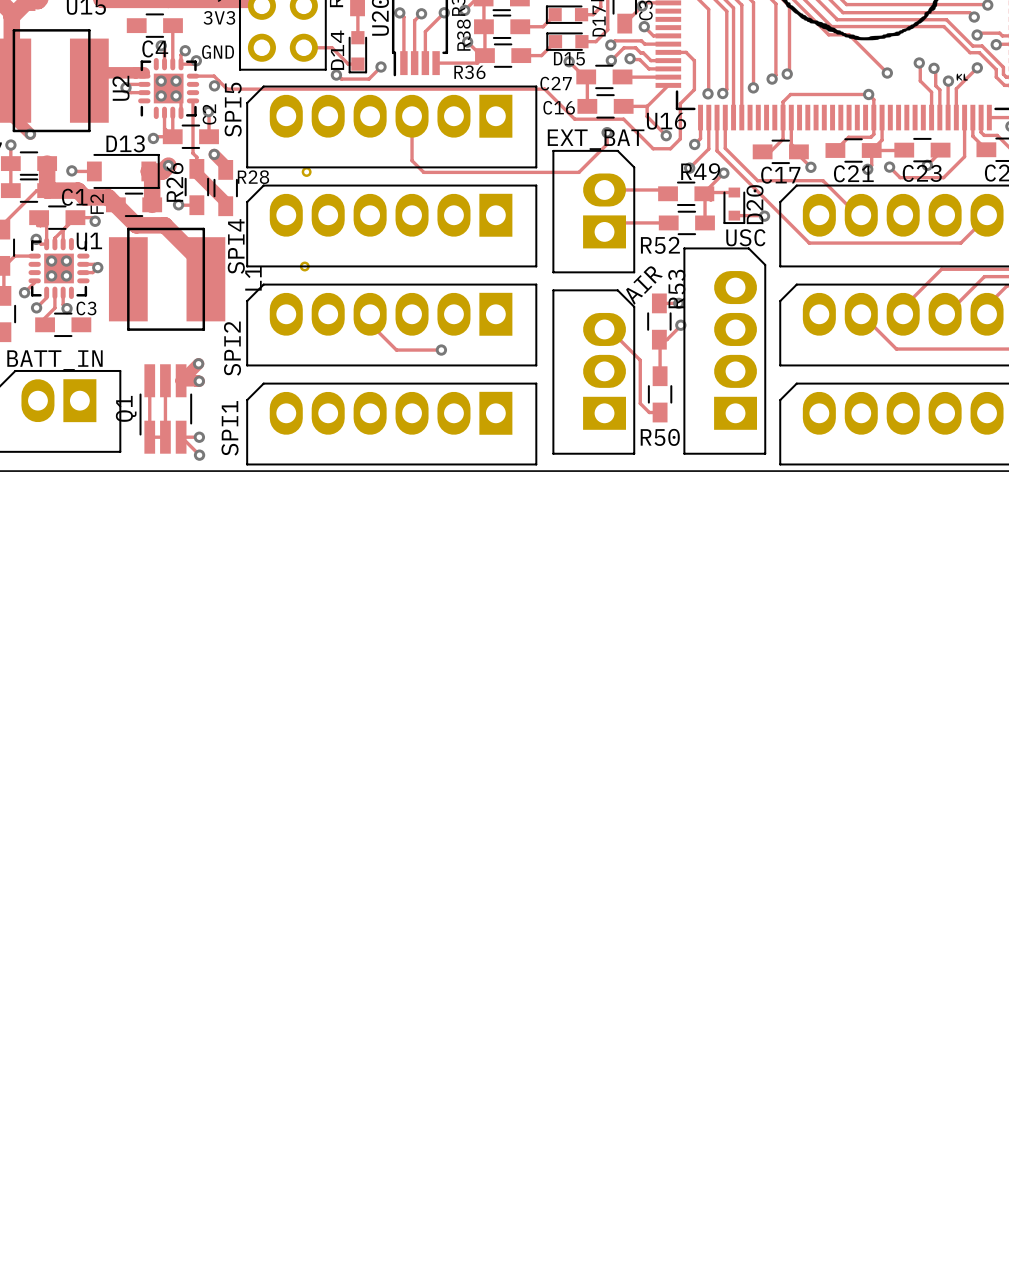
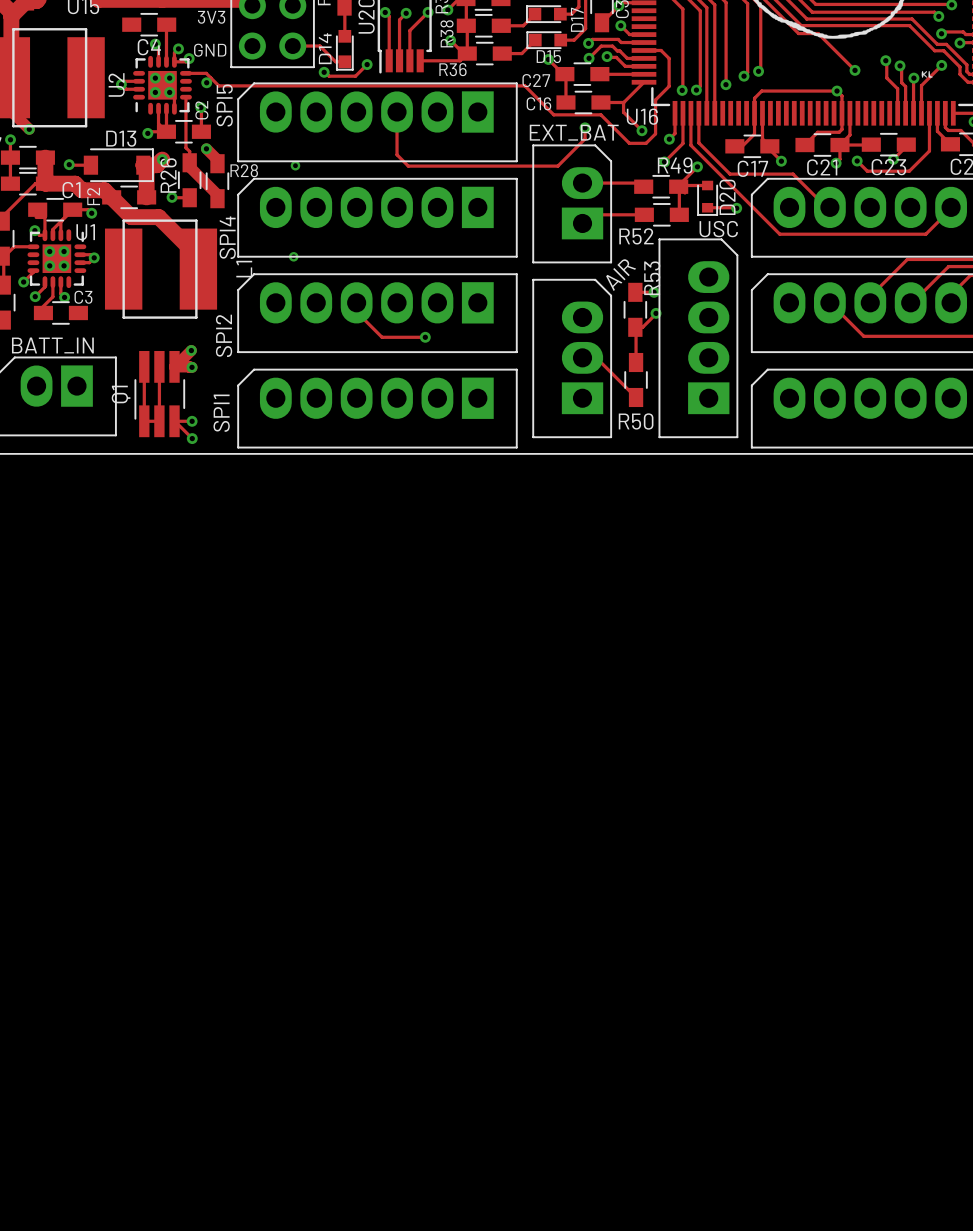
track: (144, 72) (97, 72) (93, 76) -> none
track: (604, 329) (609, 329) (640, 360) (640, 403) (649, 412) (660, 412) -> (582, 357) (596, 357) (636, 397)

